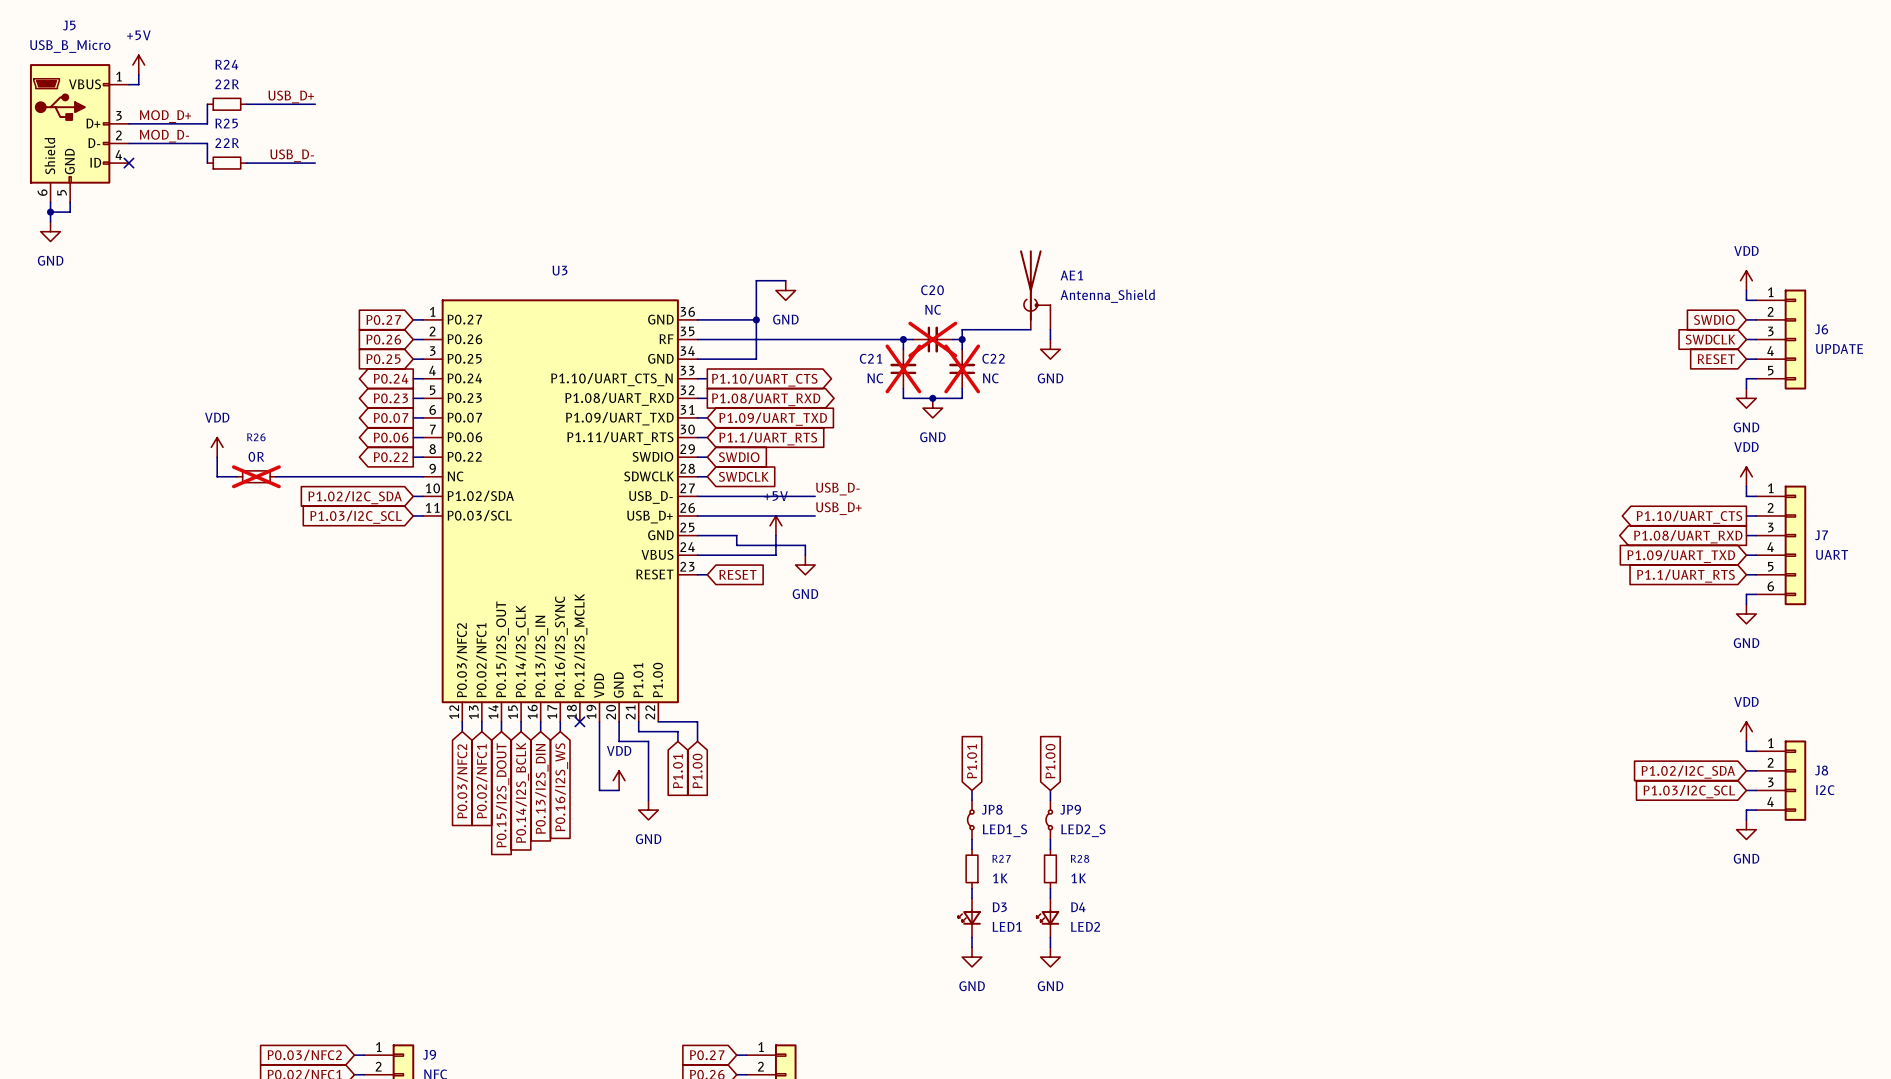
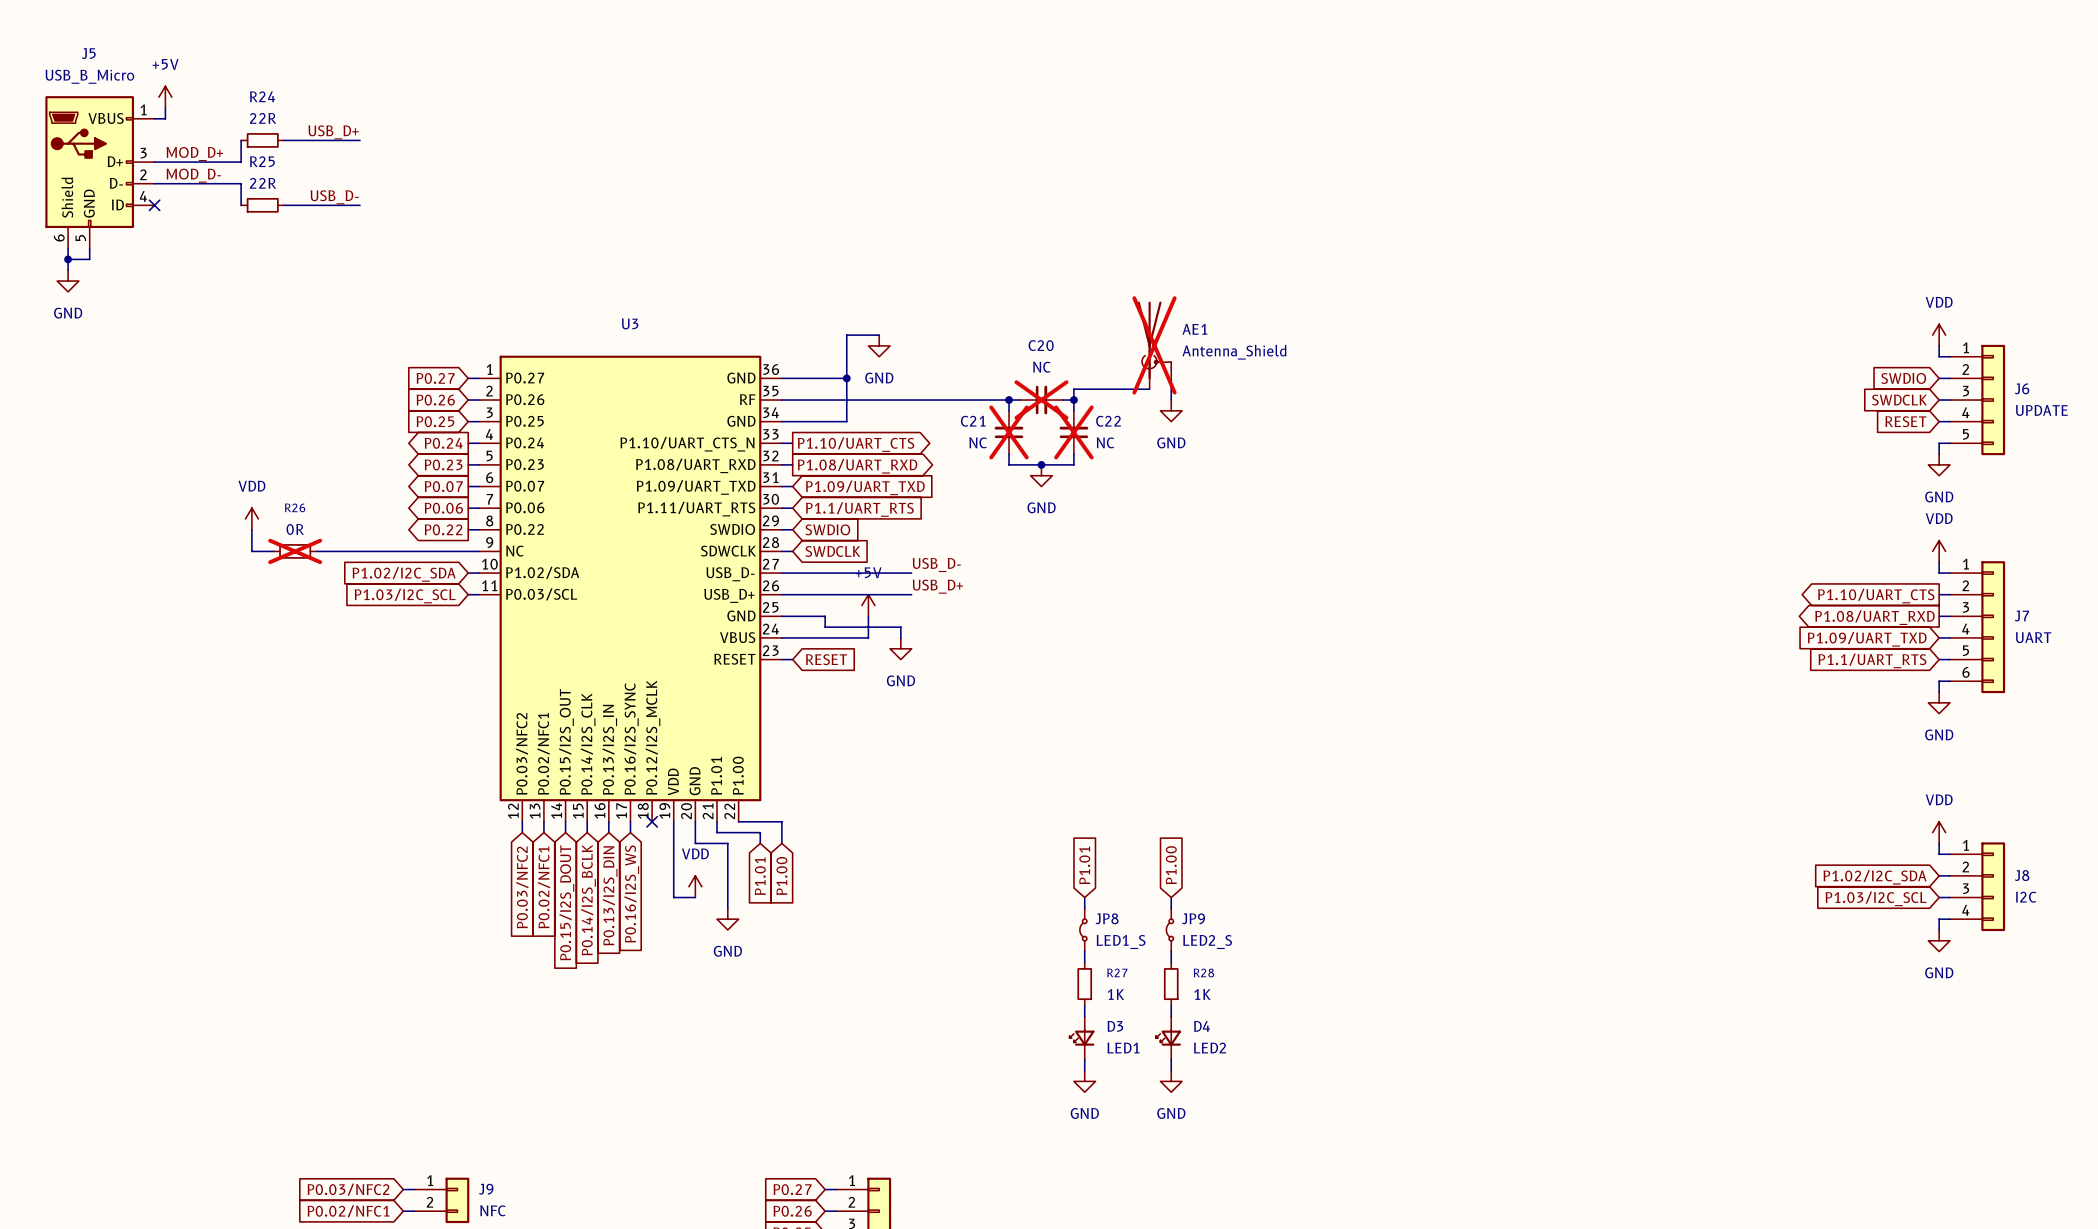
AE1 do-not-place cross: none -> (1154, 345)

